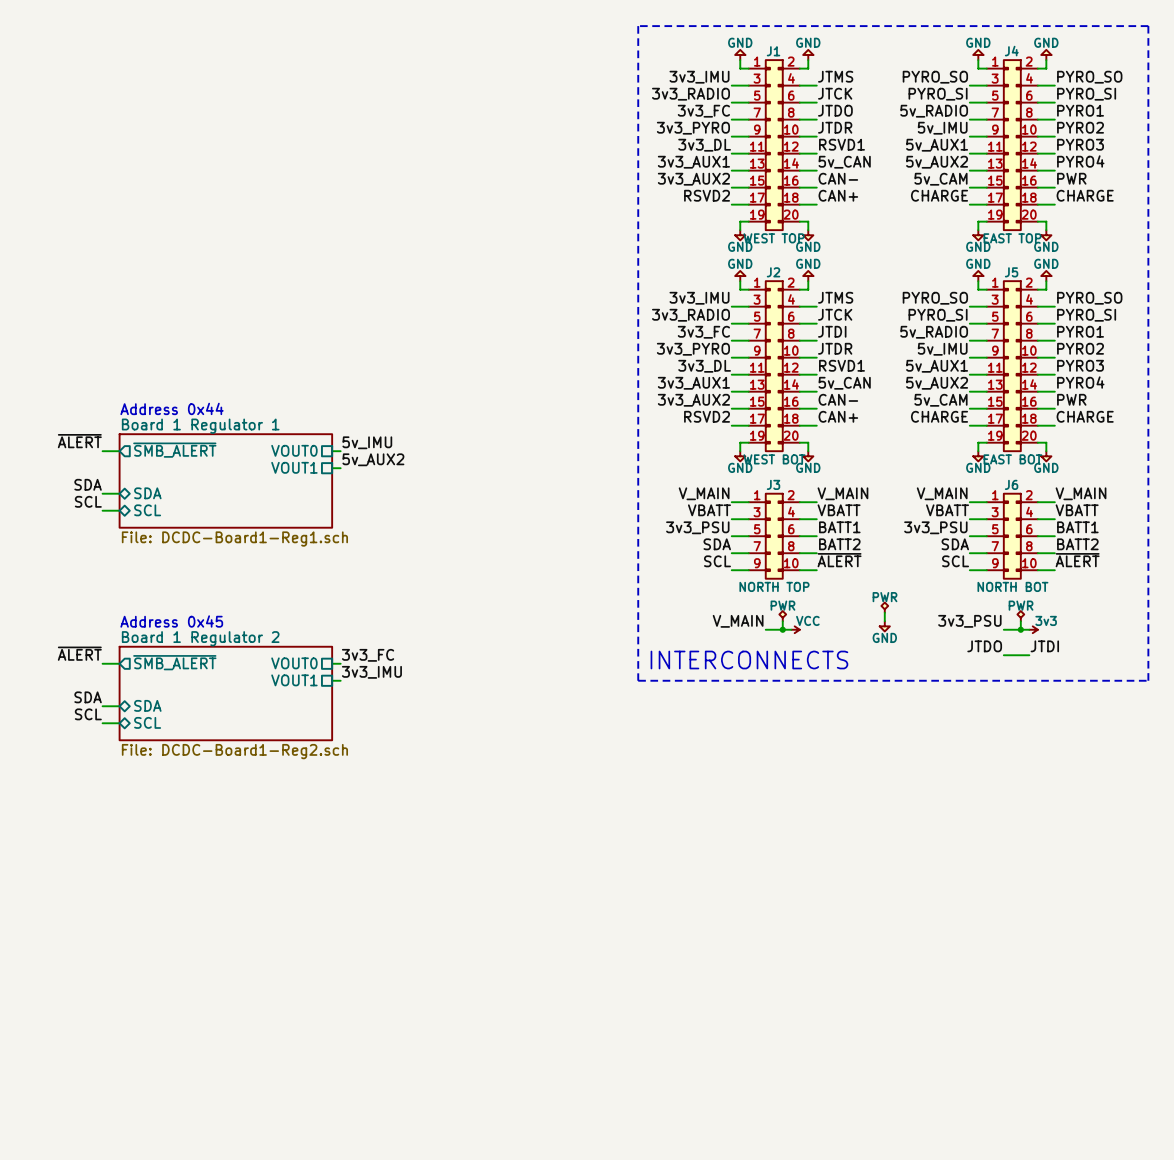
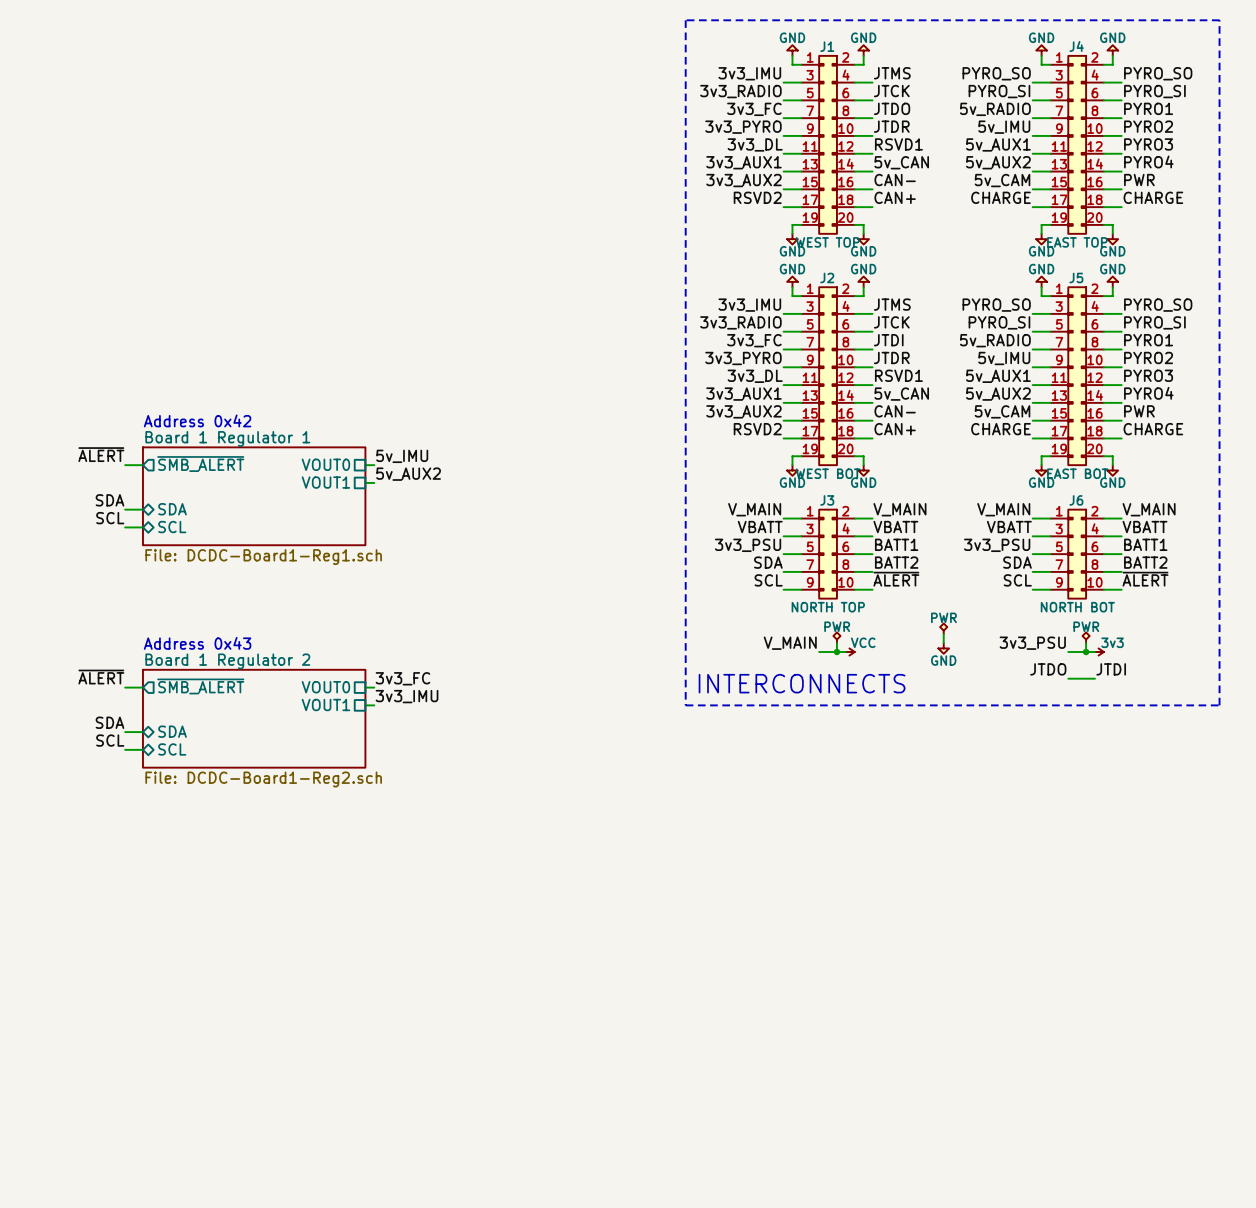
text: Address 0x44 (172, 408) -> Address 0x42 (197, 420)
text: Address 0x45 (171, 621) -> Address 0x43 (197, 643)

